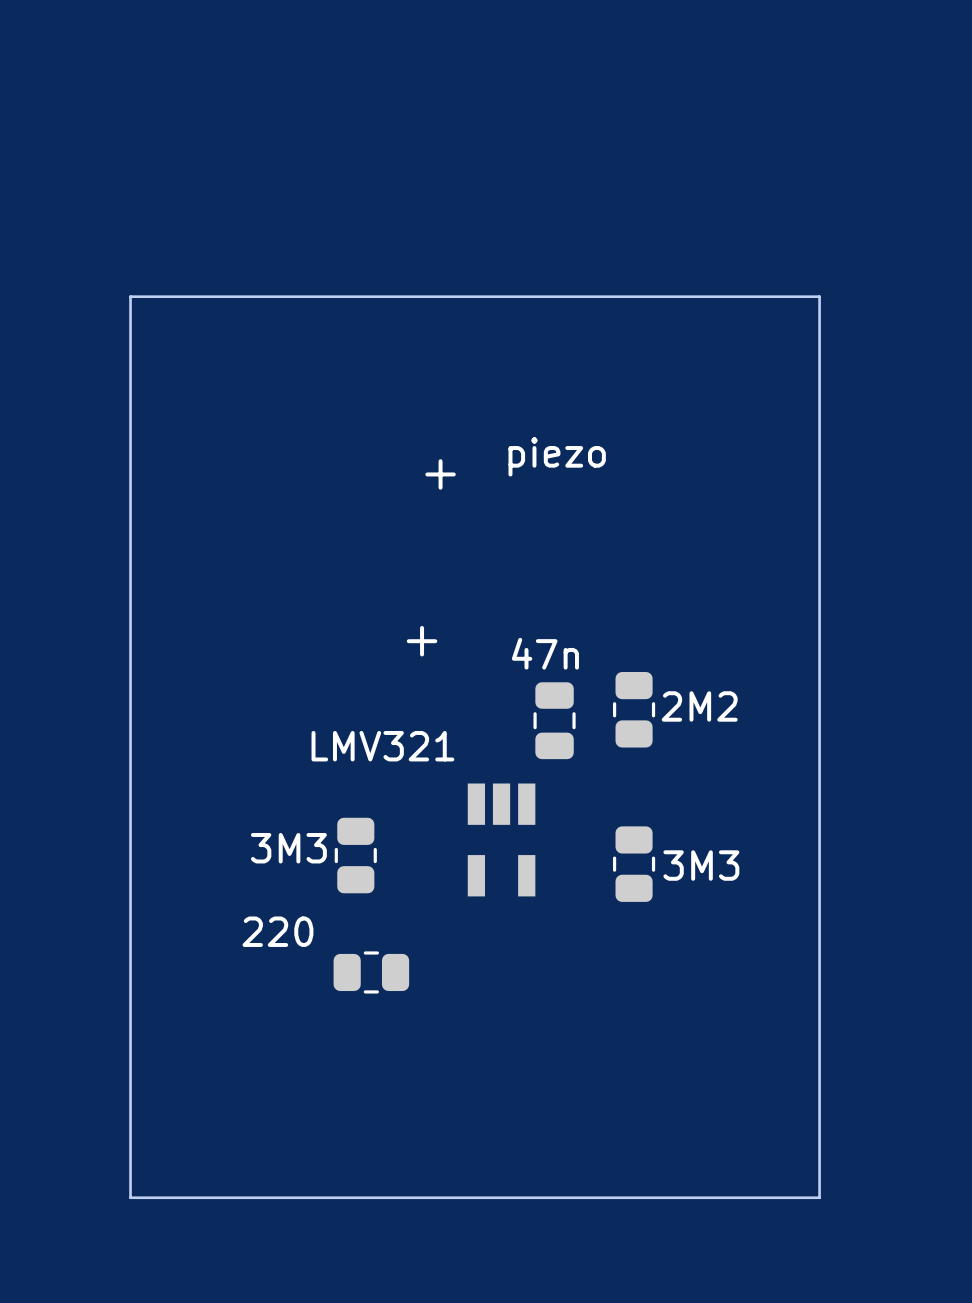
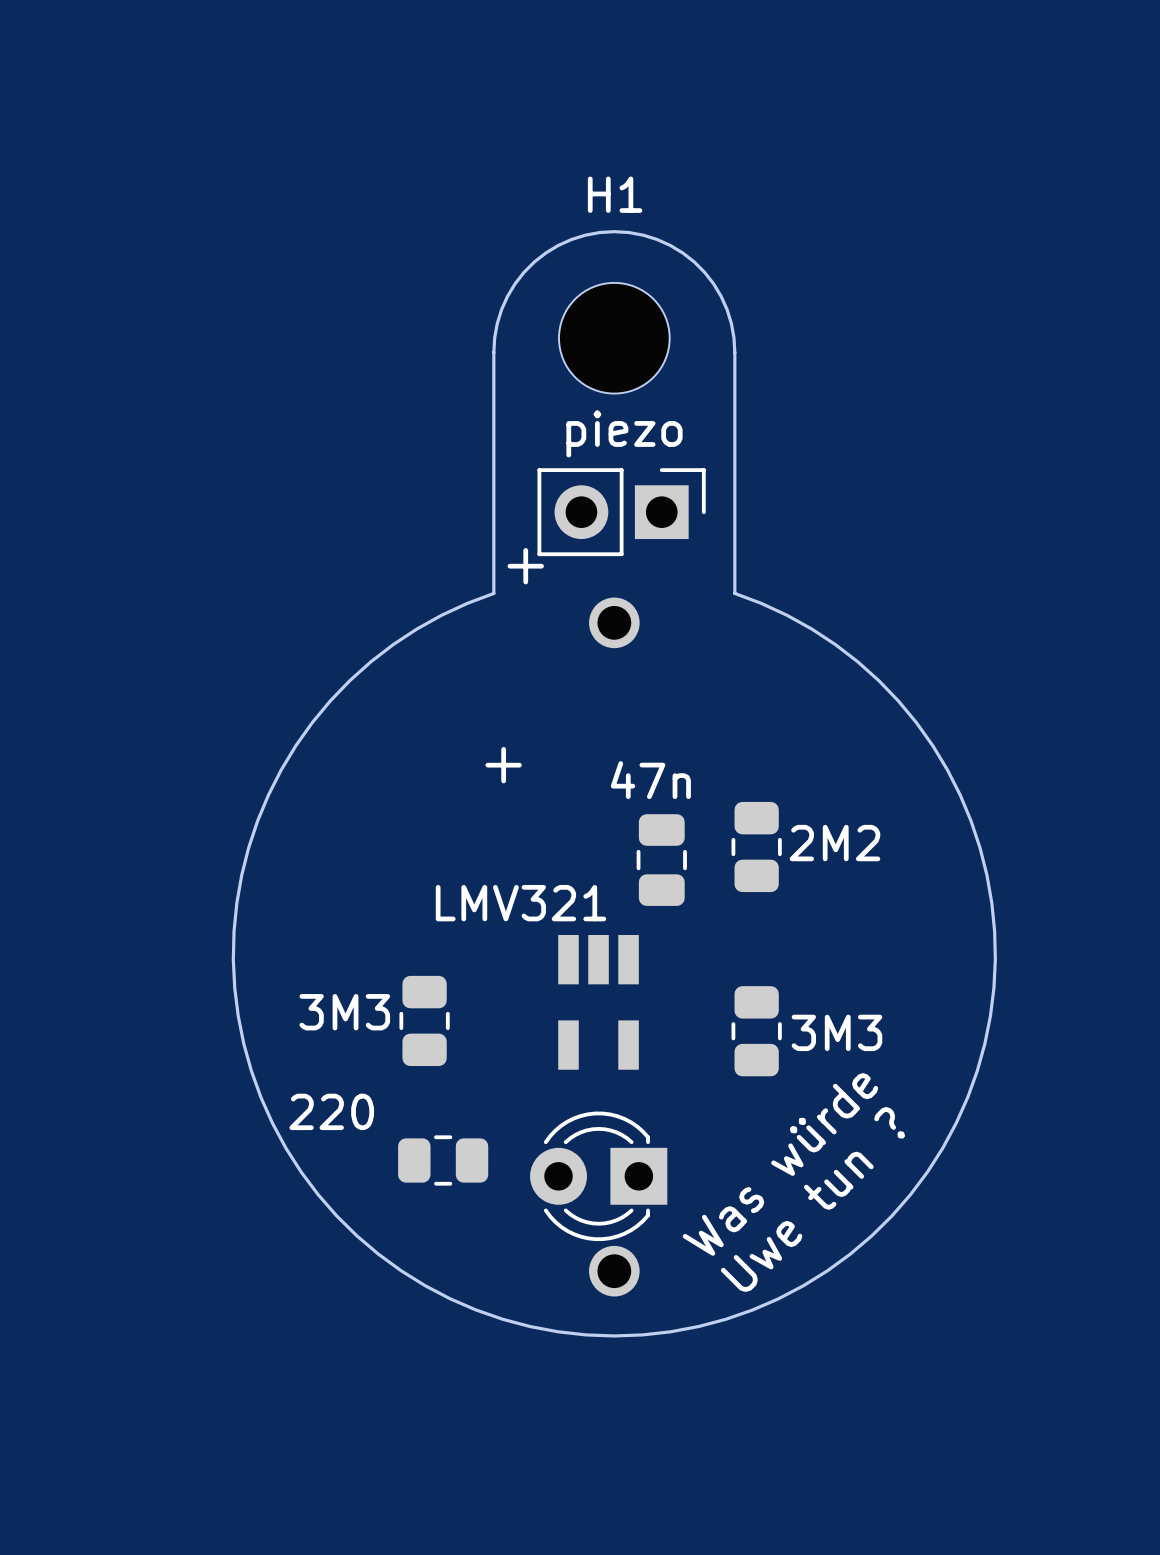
H1: none -> (614, 338)
board edge: (130, 296) (819, 296) (819, 1197) (130, 1197) (130, 296) -> (493, 352) (493, 593) (441, 615) (393, 644) (370, 661) (349, 680) (312, 722) (281, 769) (257, 821) (241, 875) (236, 903) (234, 931) (234, 987) (243, 1043) (251, 1070) (272, 1123) (285, 1148) (318, 1194) (356, 1235) (378, 1254) (425, 1285) (476, 1310) (502, 1319) (557, 1331) (586, 1334) (642, 1334) (698, 1326) (752, 1310) (778, 1298) (827, 1270) (871, 1235) (910, 1194) (927, 1172) (942, 1148) (967, 1097) (977, 1070) (990, 1015) (995, 959) (994, 931) (986, 875) (980, 848) (960, 795) (932, 745) (898, 700) (857, 661) (811, 628) (786, 615) (734, 593) (733, 337) (727, 309) (713, 283) (704, 272) (682, 253) (657, 239) (643, 235) (614, 231) (585, 235) (571, 239) (545, 253) (534, 262) (515, 283) (507, 296) (497, 323) (493, 352)
part: none -> (621, 512)
text position: piezo (557, 456) -> piezo (624, 433)
part: none -> (614, 622)
LMV321 name position: LMV321 (382, 746) -> LMV321 (520, 903)
text: none -> Was würde (780, 1164)
part: none -> (598, 1176)
text: none -> Uwe tun ? (812, 1199)
part: none -> (614, 1271)

